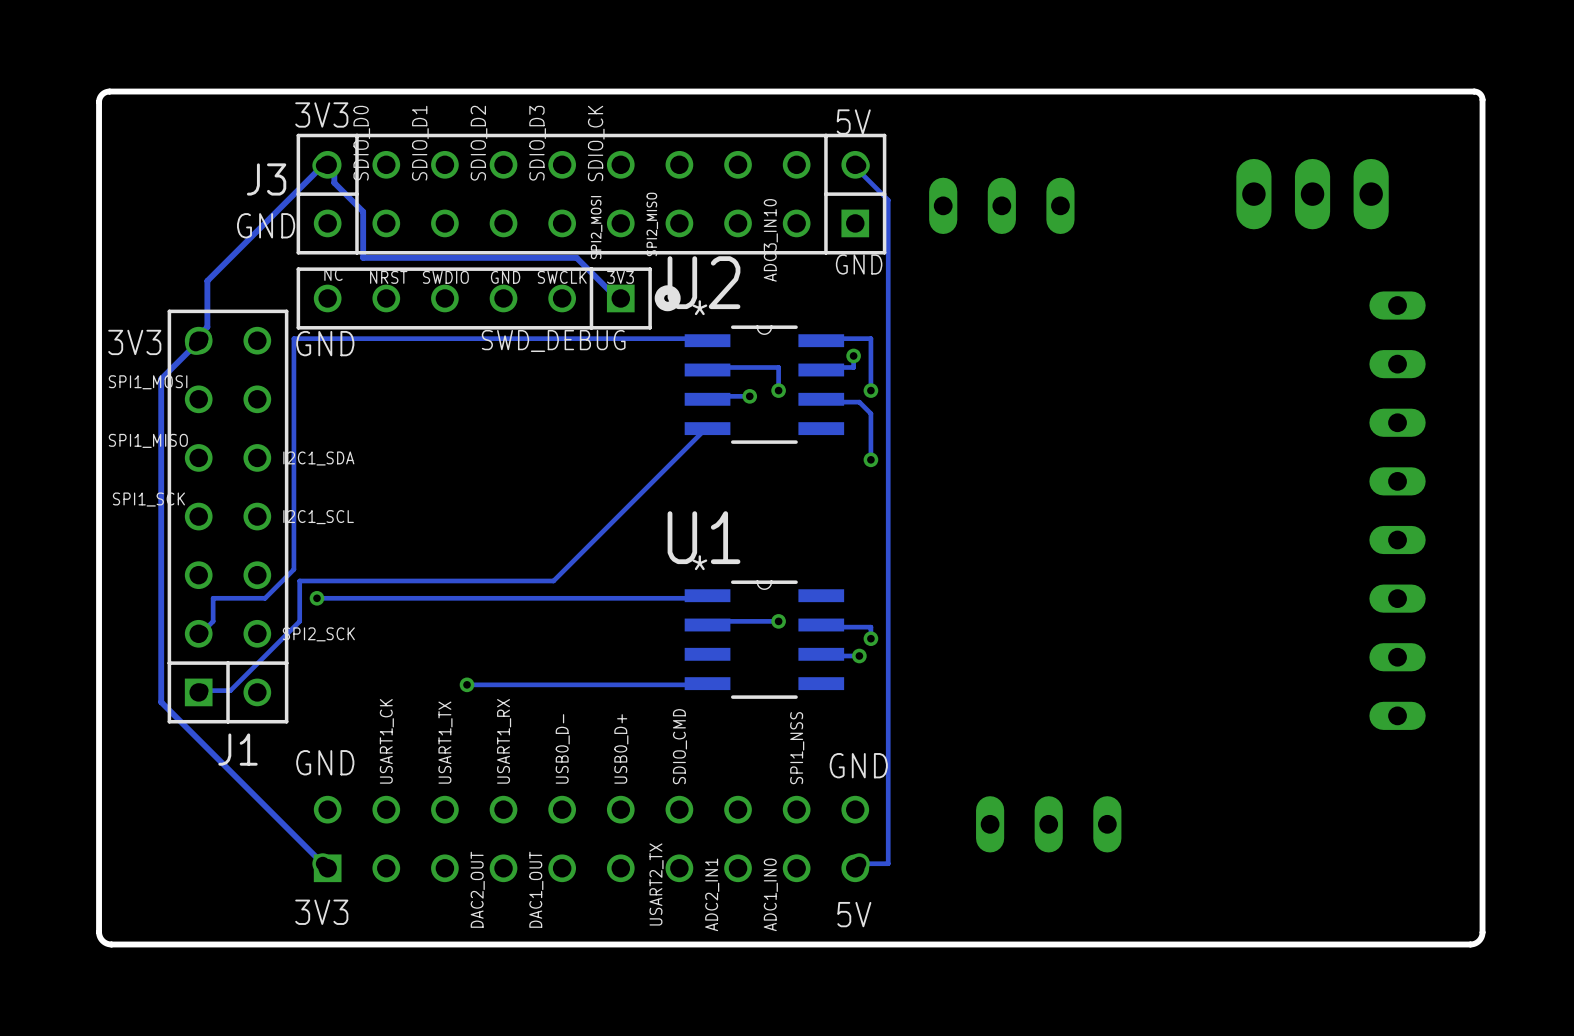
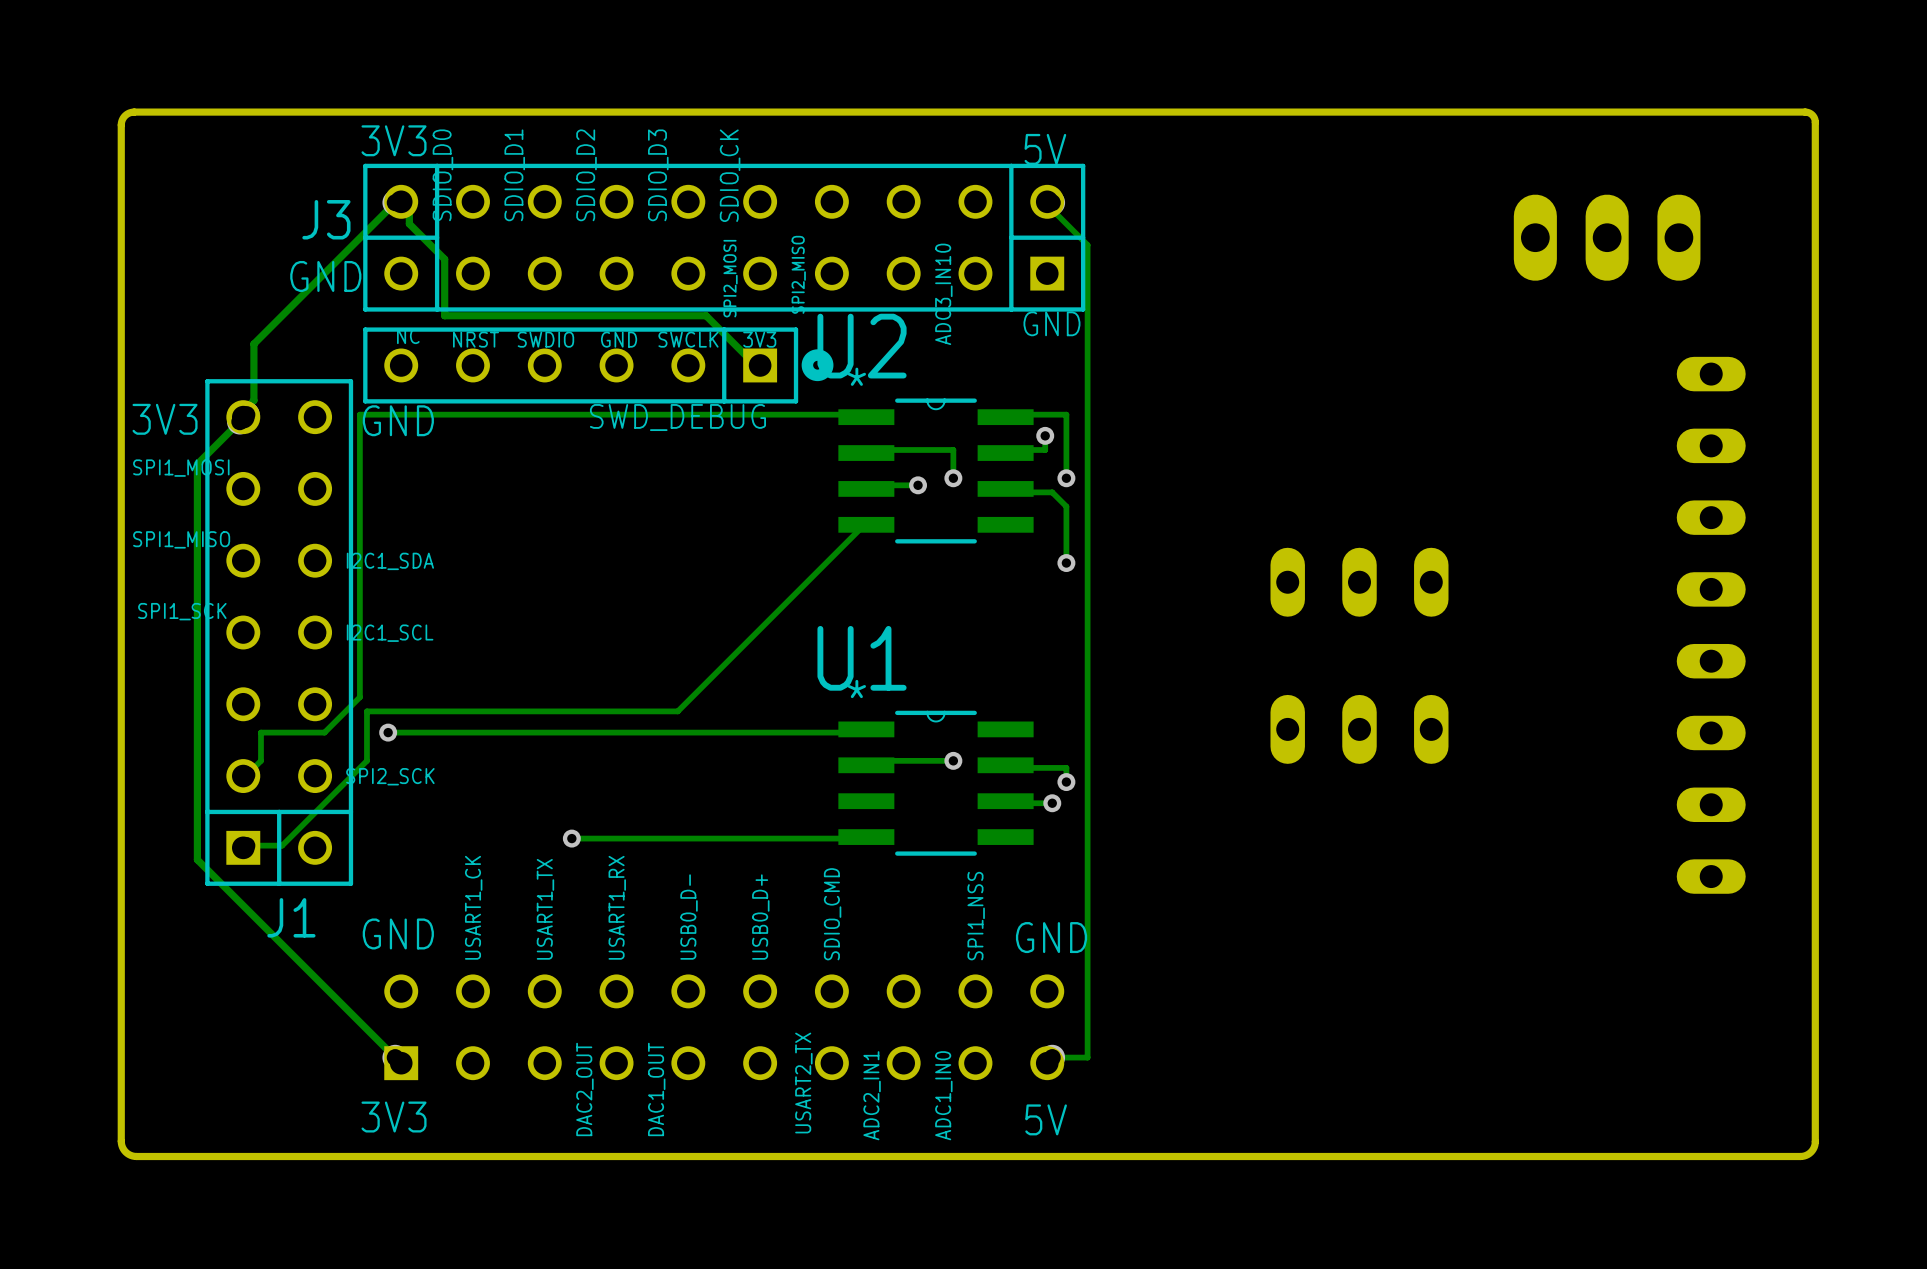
part: (1001, 205) -> none
part: none -> (1359, 582)
part: none -> (1359, 729)
part: (1048, 824) -> none

